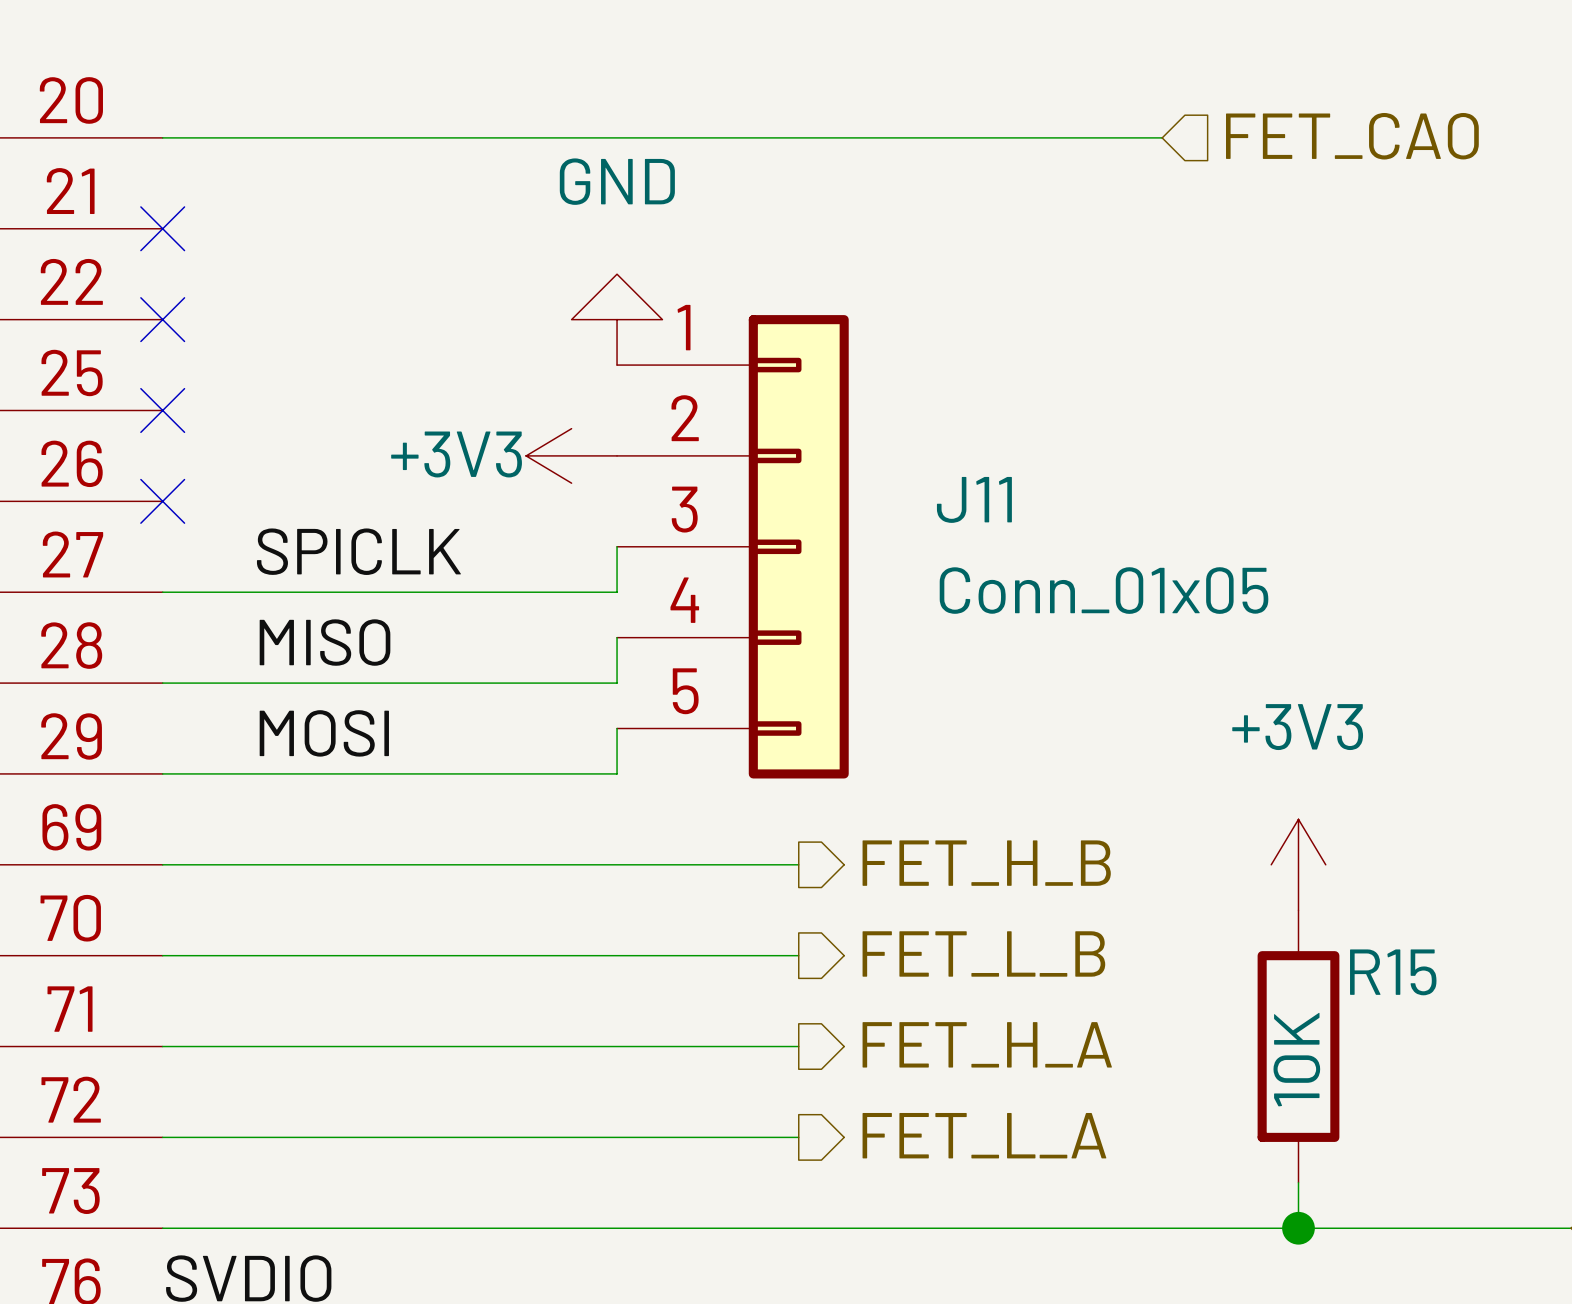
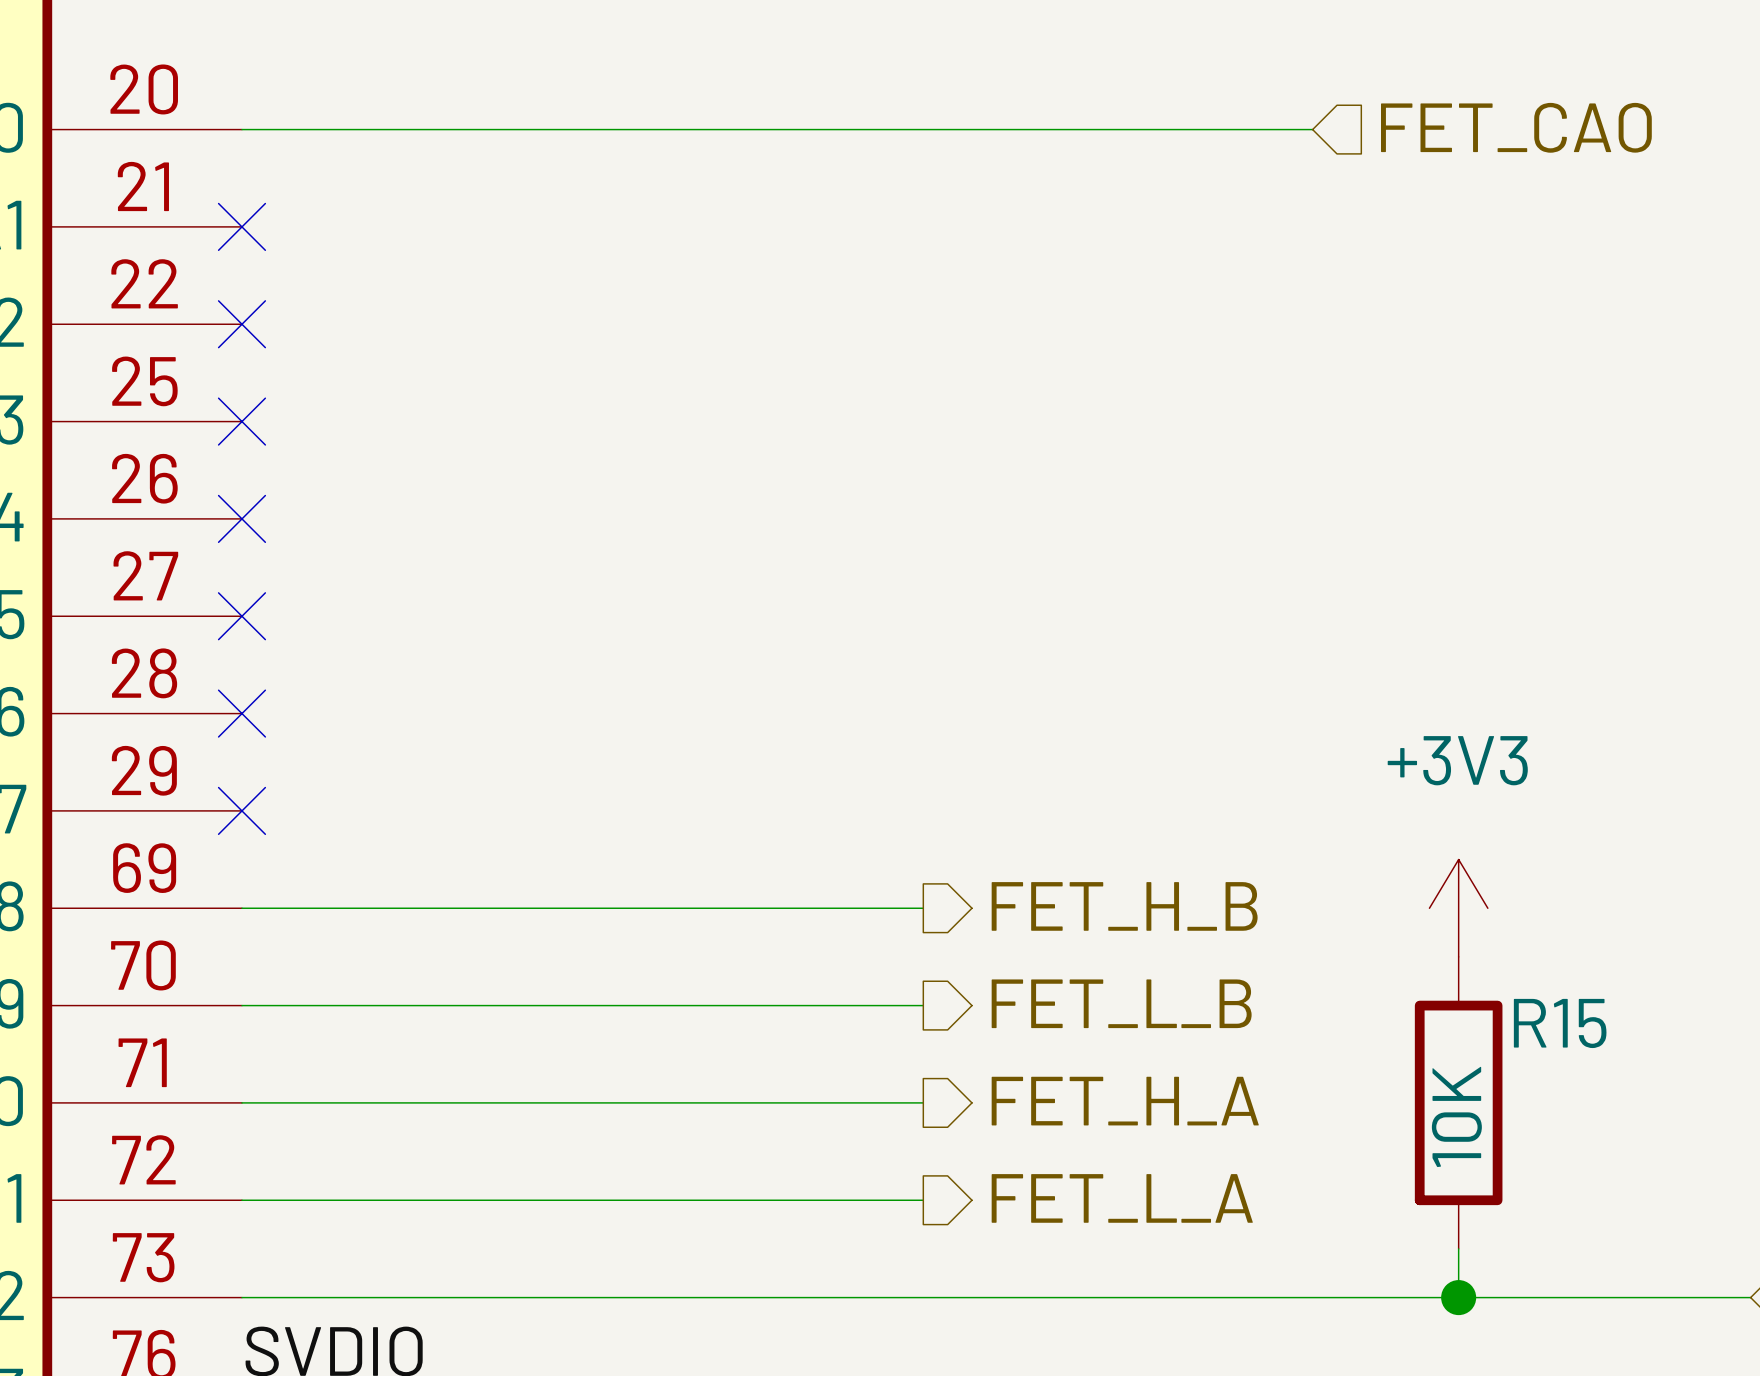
power symbol: GND (617, 319) -> none
power symbol: +3V3 (571, 455) -> none
wire: (617, 546) (617, 592) (162, 592) -> none
J11: Conn_01x05 (732, 546) -> none
label: SPICLK (358, 551) -> none
no-connect mark: none -> (241, 616)
wire: (617, 637) (617, 683) (162, 683) -> none
label: MISO (325, 642) -> none
no-connect mark: none -> (241, 713)
wire: (617, 728) (617, 773) (162, 773) -> none
label: MOSI (324, 733) -> none
no-connect mark: none -> (241, 810)

